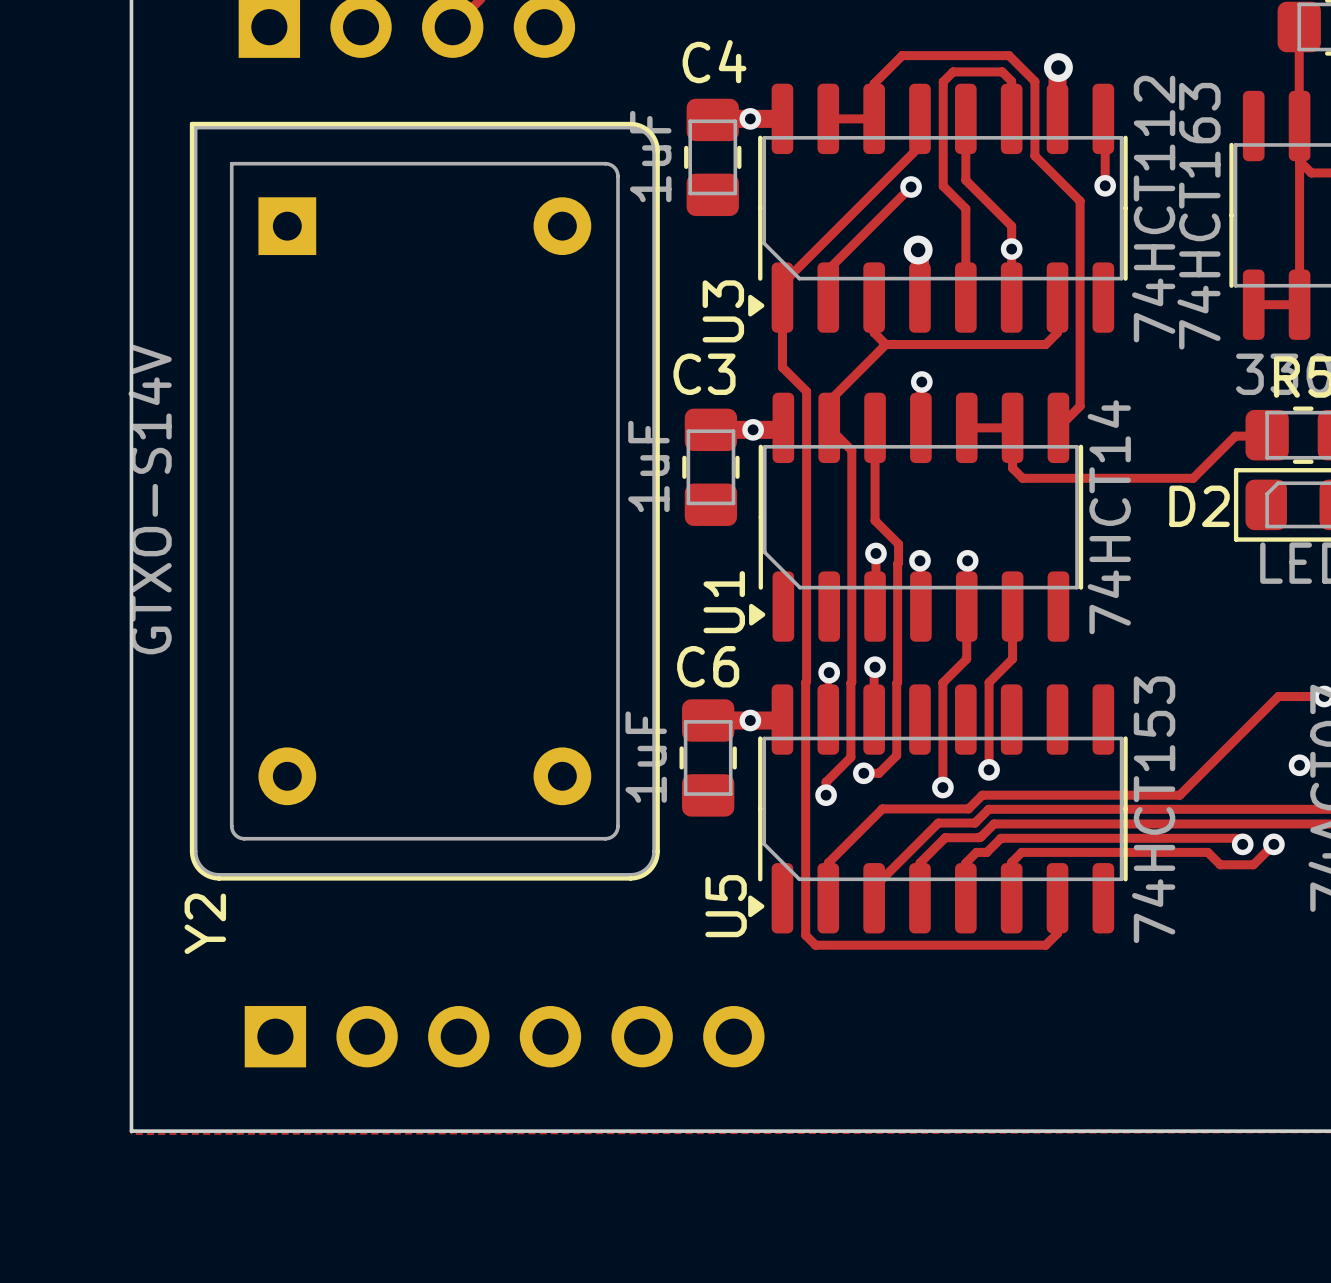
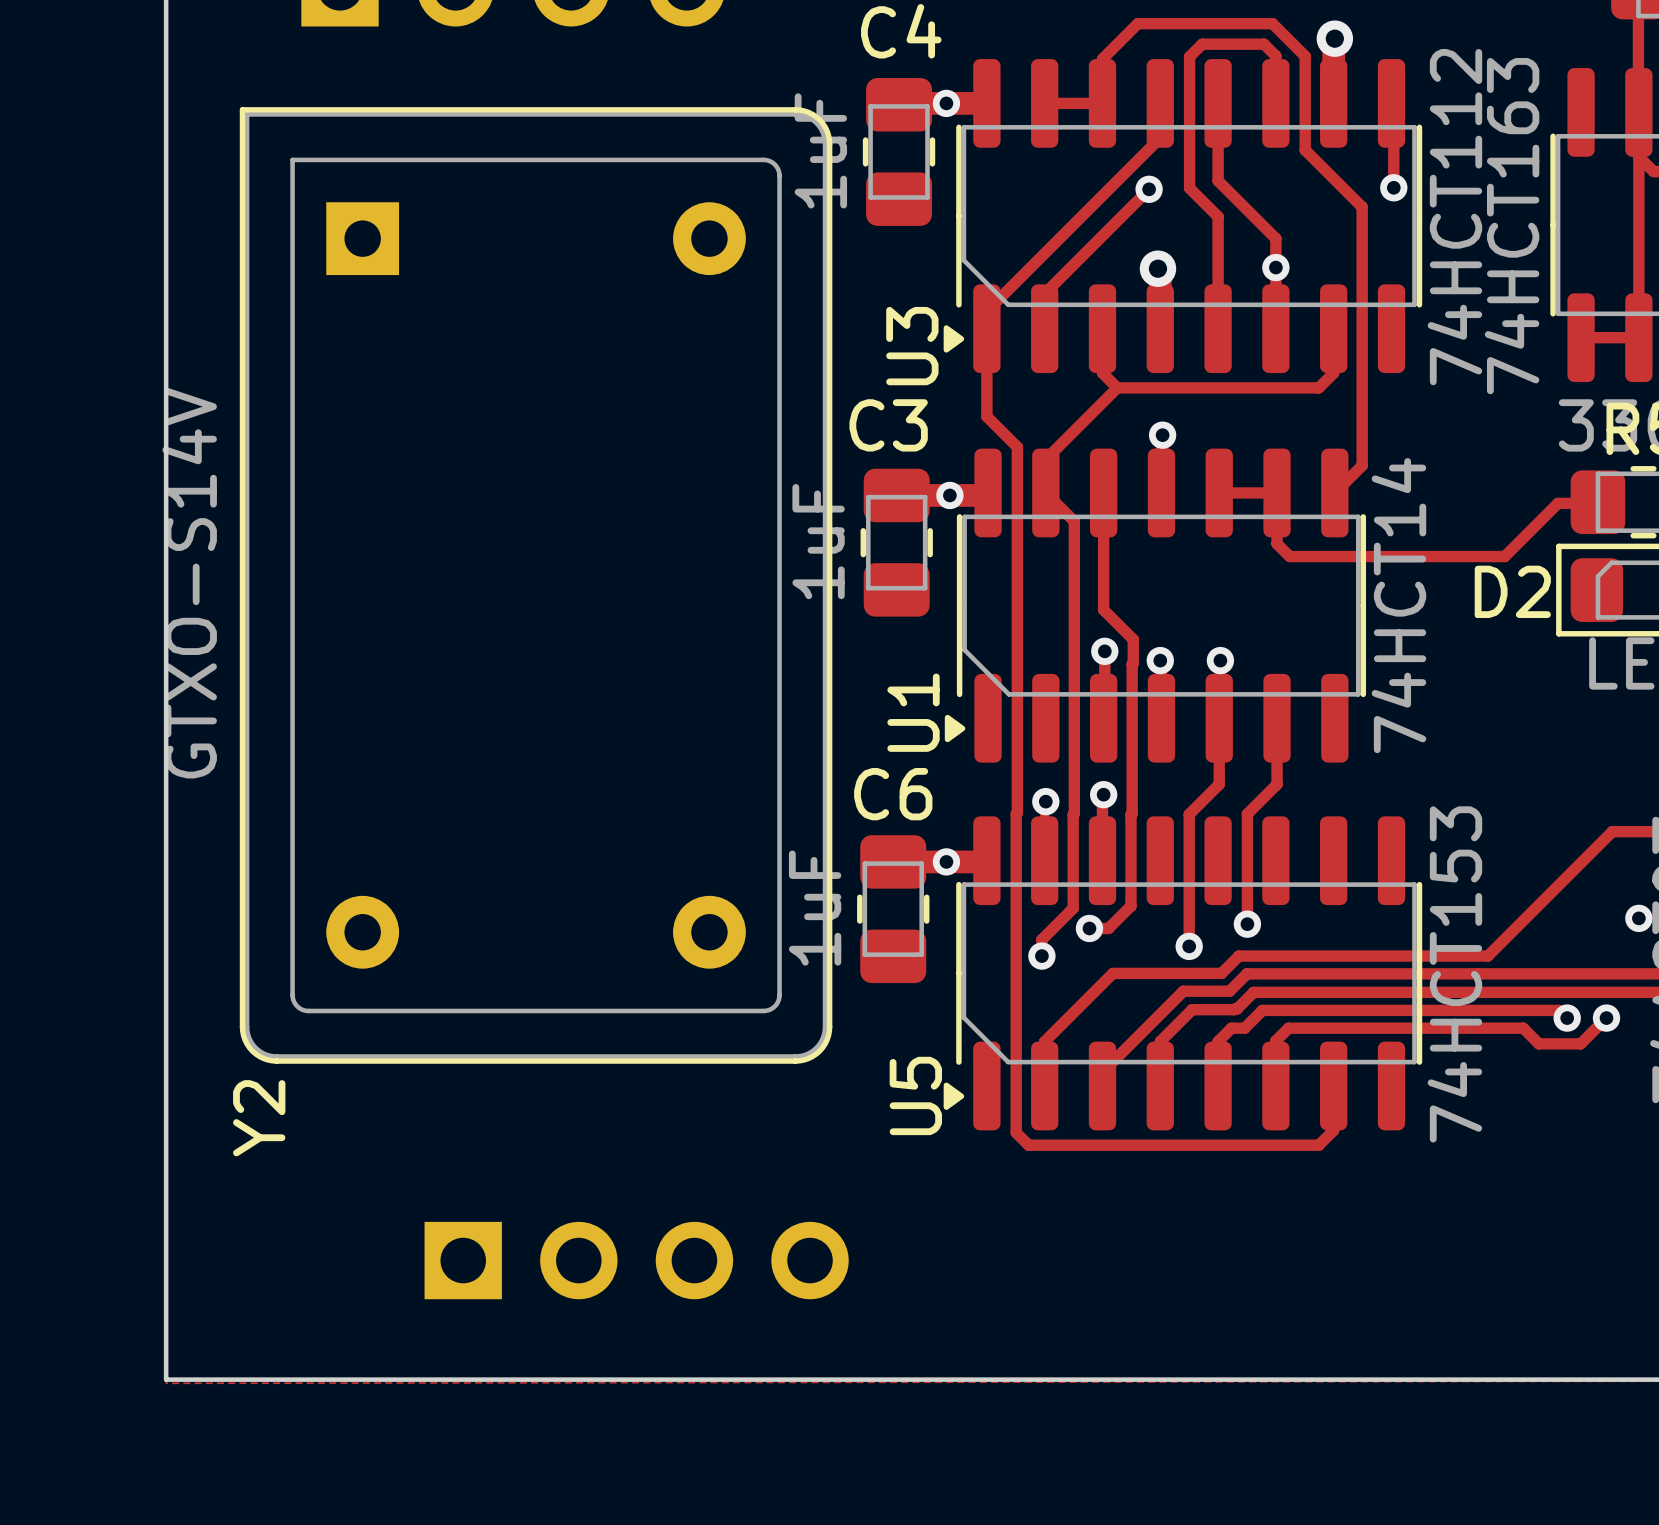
part footprint: [244, 1006, 765, 1068] -> [424, 1221, 849, 1300]

